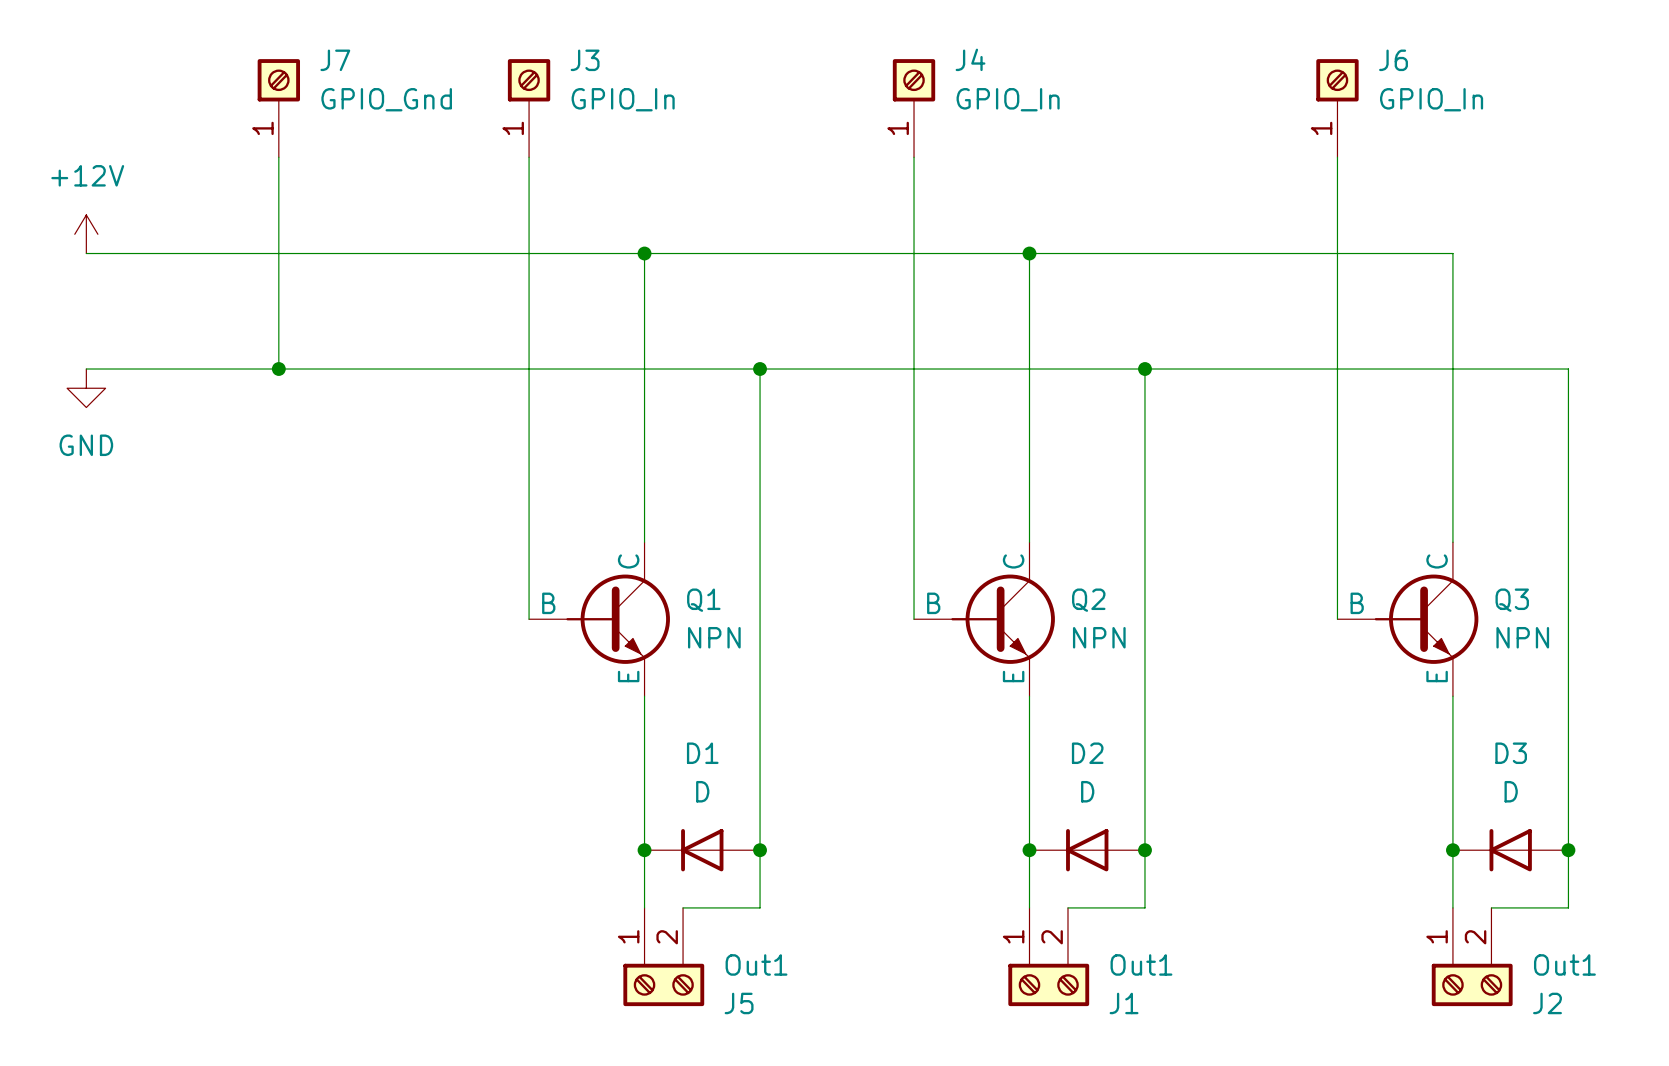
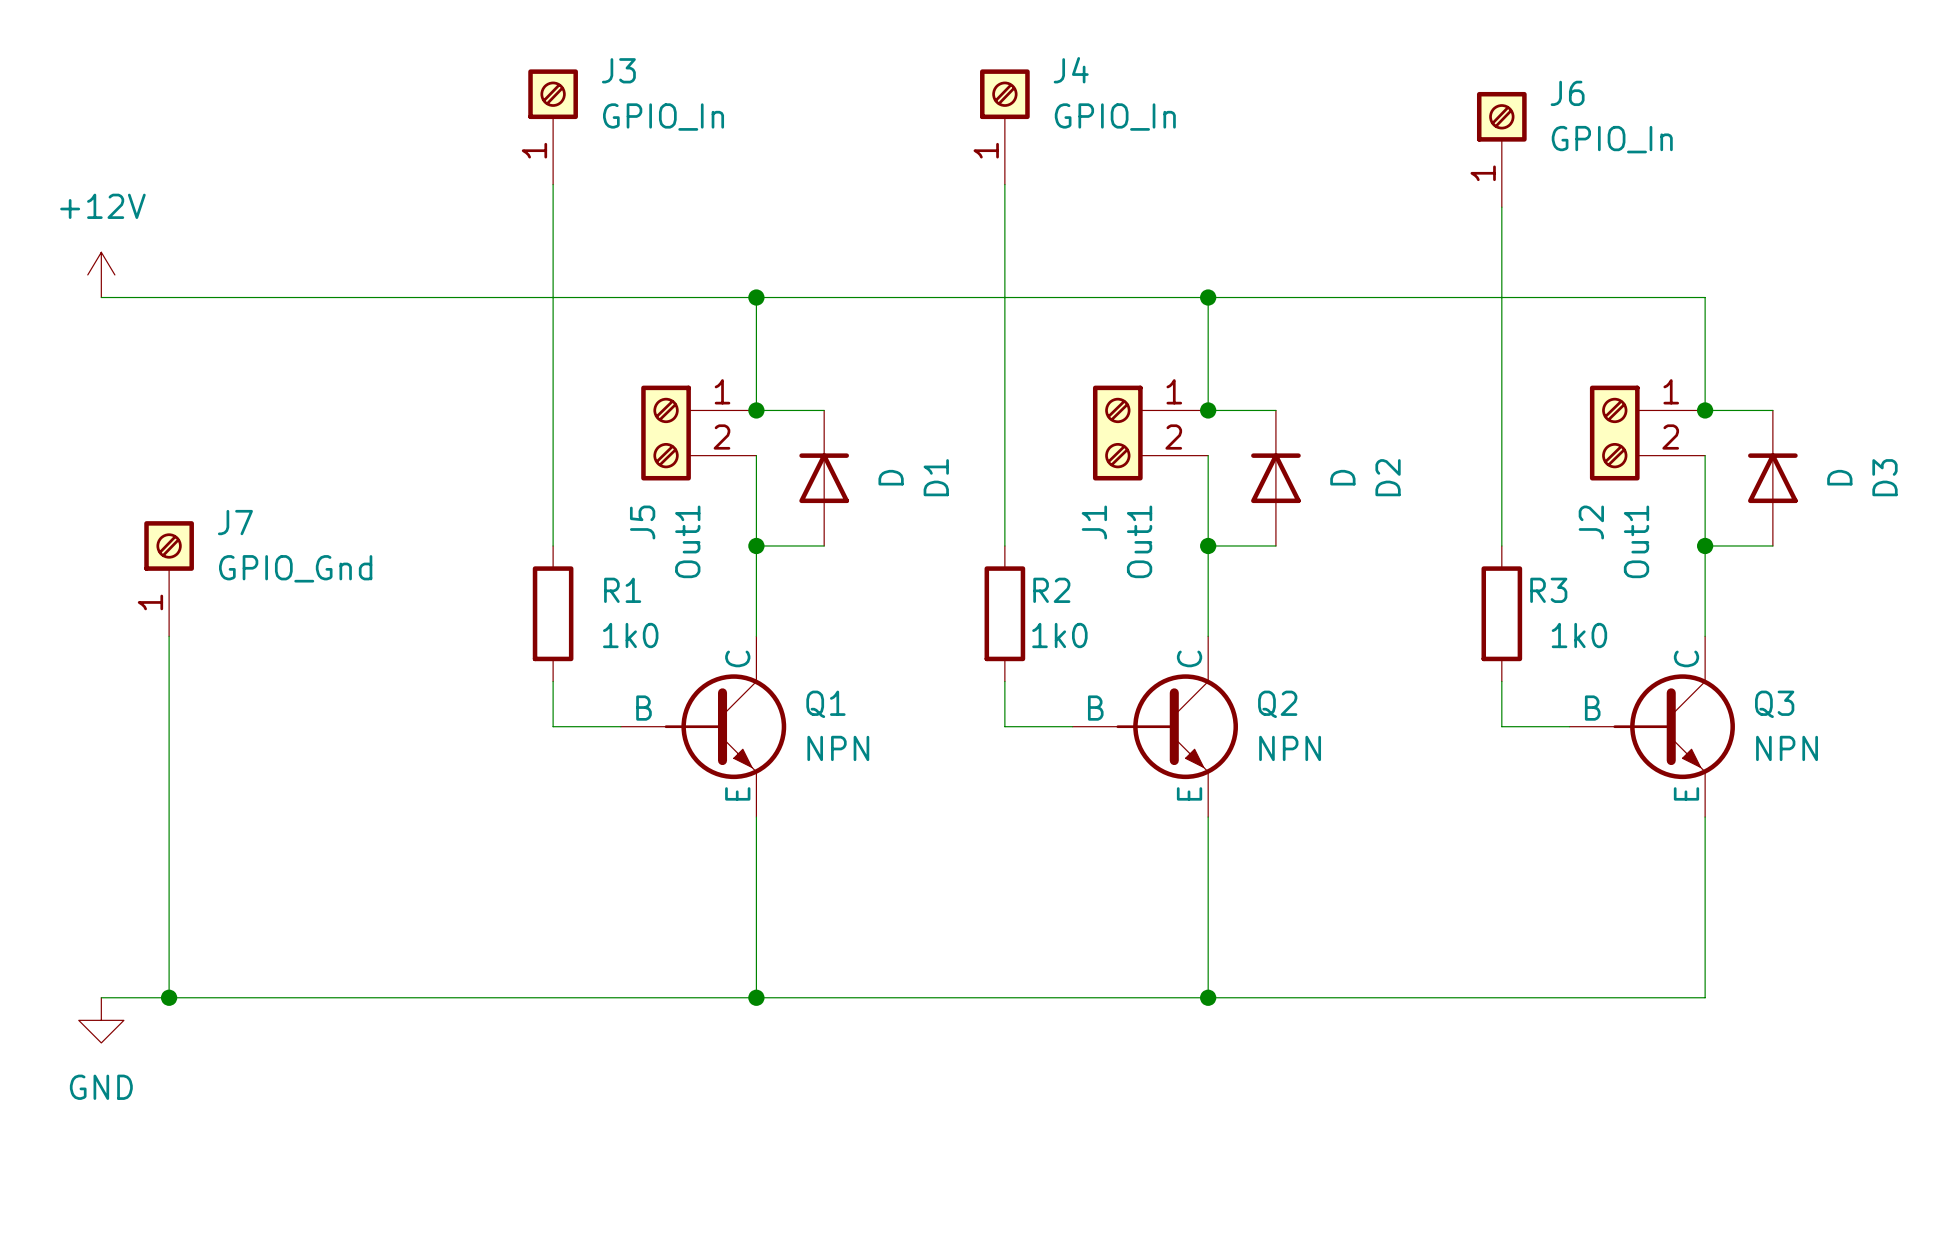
J7 position: (278, 108) -> (169, 578)
J3 position: (529, 108) -> (553, 126)
J4 position: (914, 108) -> (1004, 126)
J6 position: (1337, 108) -> (1501, 149)
wire: (278, 157) (278, 369) -> none
wire: none -> (553, 184) (553, 545)
wire: (529, 157) (529, 619) -> (553, 681) (553, 726) (620, 726)
wire: none -> (1004, 184) (1004, 545)
wire: (914, 157) (914, 619) -> (1004, 681) (1004, 726) (1072, 726)
wire: (1337, 157) (1337, 619) -> (1501, 681) (1501, 726) (1569, 726)
wire: none -> (1501, 207) (1501, 545)
wire: (644, 349) (644, 388) -> (756, 410) (824, 410)
junction: none -> (756, 410)
wire: (1029, 349) (1029, 388) -> (1208, 410) (1275, 410)
junction: none -> (1208, 410)
wire: (1452, 349) (1452, 388) -> (1705, 410) (1772, 410)
junction: none -> (1705, 410)
wire: (86, 369) (1568, 369) (1568, 907) (1491, 907) -> none
junction: (278, 369) -> none
wire: (760, 369) (760, 907) (683, 907) -> none
junction: (760, 369) -> none
wire: (1144, 369) (1144, 907) (1067, 907) -> none
junction: (1144, 369) -> none
power symbol: GND (86, 388) -> none
wire: none -> (756, 545) (824, 545)
junction: none -> (756, 545)
wire: none -> (1208, 545) (1275, 545)
junction: none -> (1208, 545)
wire: none -> (1705, 545) (1772, 545)
junction: none -> (1705, 545)
R1: none -> 1k0 (553, 613)
R2: none -> 1k0 (1004, 613)
R3: none -> 1k0 (1501, 613)
wire: none -> (169, 636) (169, 997)
junction: none -> (169, 997)
wire: (644, 850) (644, 907) -> none
D1 rotation: 0° (702, 850) -> 90° clockwise (824, 478)
D1 position: (702, 850) -> (824, 478)
junction: (760, 850) -> none
wire: (1029, 850) (1029, 907) -> none
D2 rotation: 0° (1087, 850) -> 90° clockwise (1275, 478)
D2 position: (1087, 850) -> (1275, 478)
junction: (1144, 850) -> none
wire: (1452, 850) (1452, 907) -> (1705, 997) (101, 997)
junction: (1452, 850) -> none
D3 rotation: 0° (1510, 850) -> 90° clockwise (1772, 478)
D3 position: (1510, 850) -> (1772, 478)
junction: (1568, 850) -> none
power symbol: none -> GND (101, 1020)
J5 position: (663, 957) -> (698, 433)
J1 position: (1048, 957) -> (1150, 433)
J2 position: (1472, 957) -> (1647, 433)
J5 rotation: 0° (663, 984) -> 90° clockwise (666, 433)
J1 rotation: 0° (1048, 984) -> 90° clockwise (1117, 433)
J2 rotation: 0° (1472, 984) -> 90° clockwise (1614, 433)

